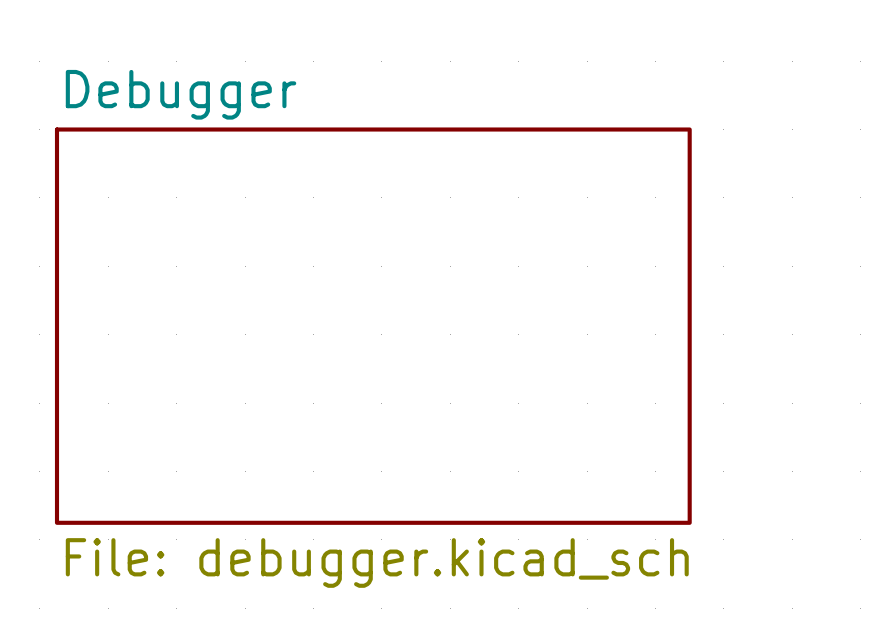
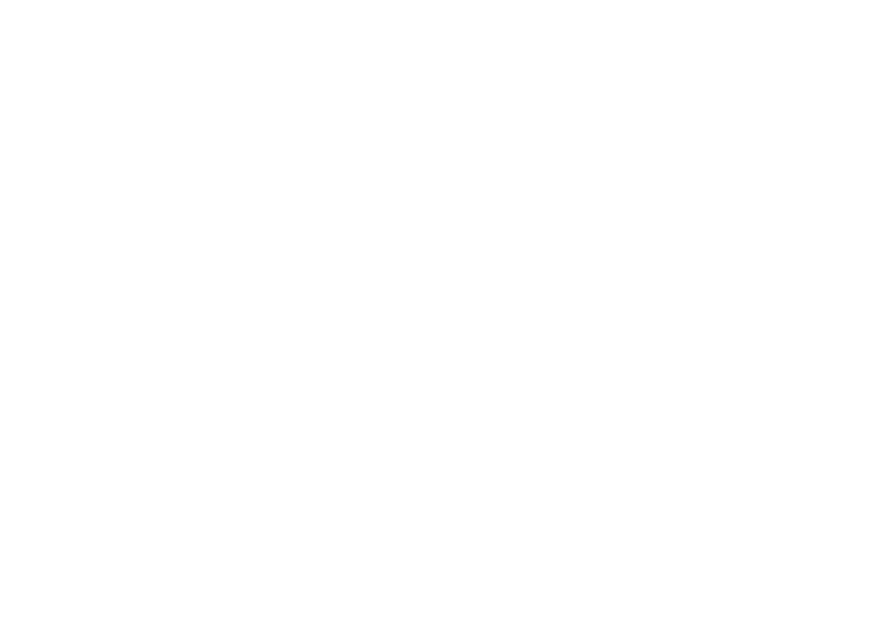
sheet Debugger: File: debugger.kicad_sch (373, 326) -> none

